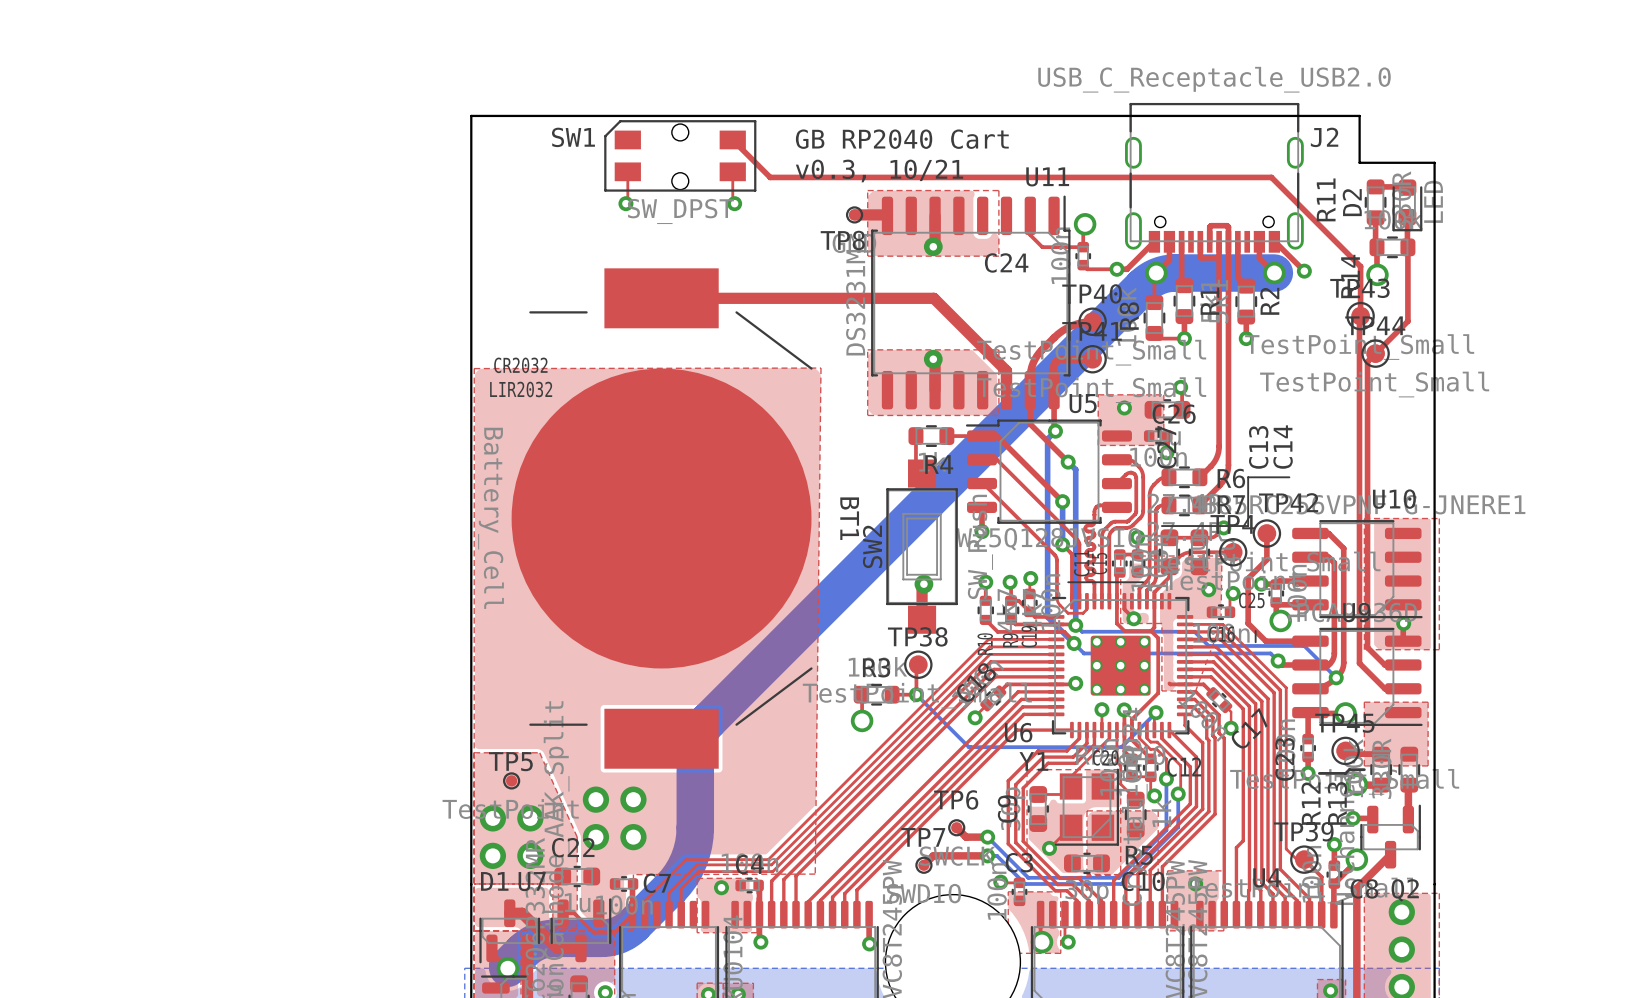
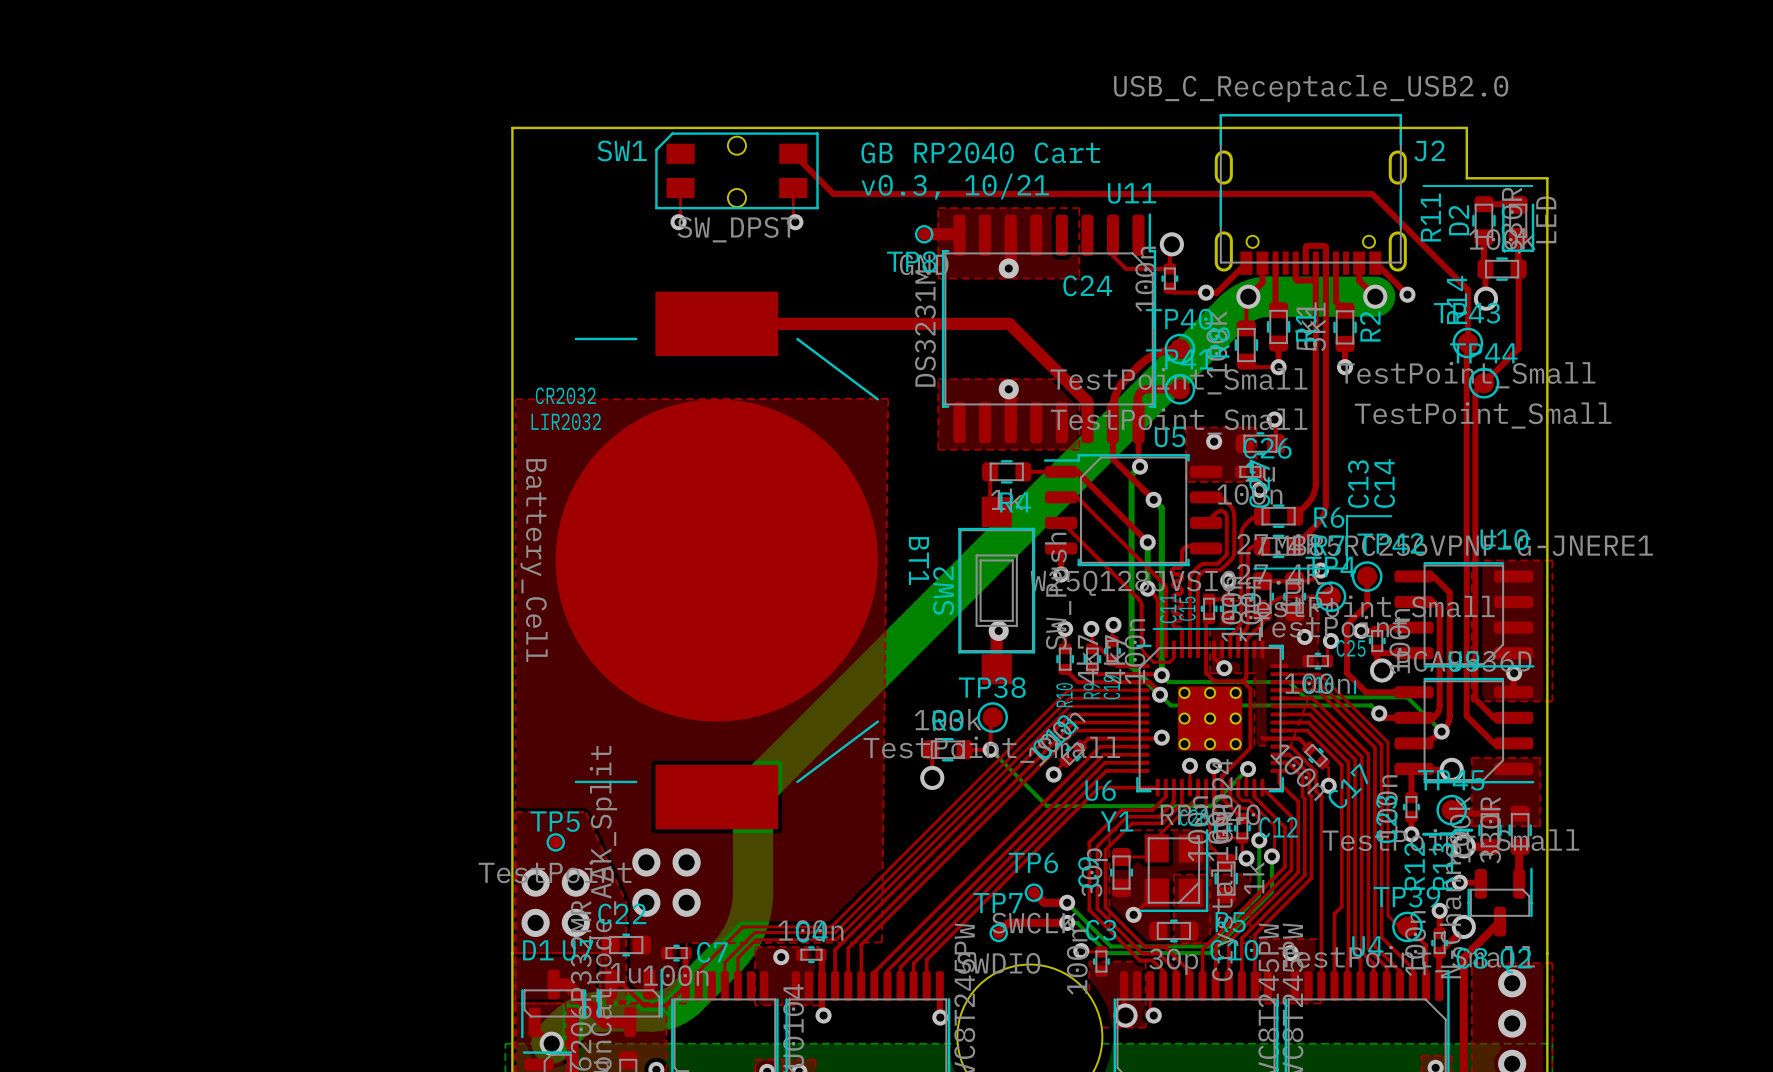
line: none -> (1423, 185) (1532, 185)

